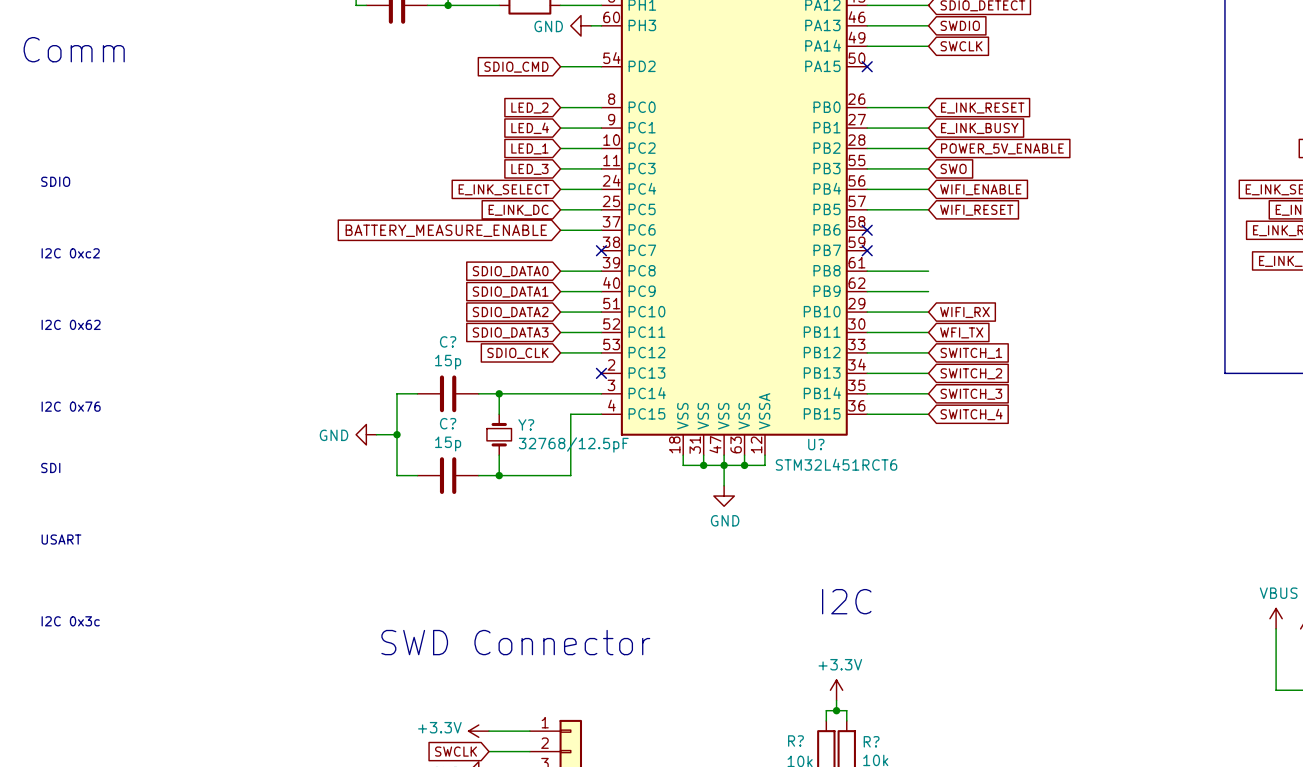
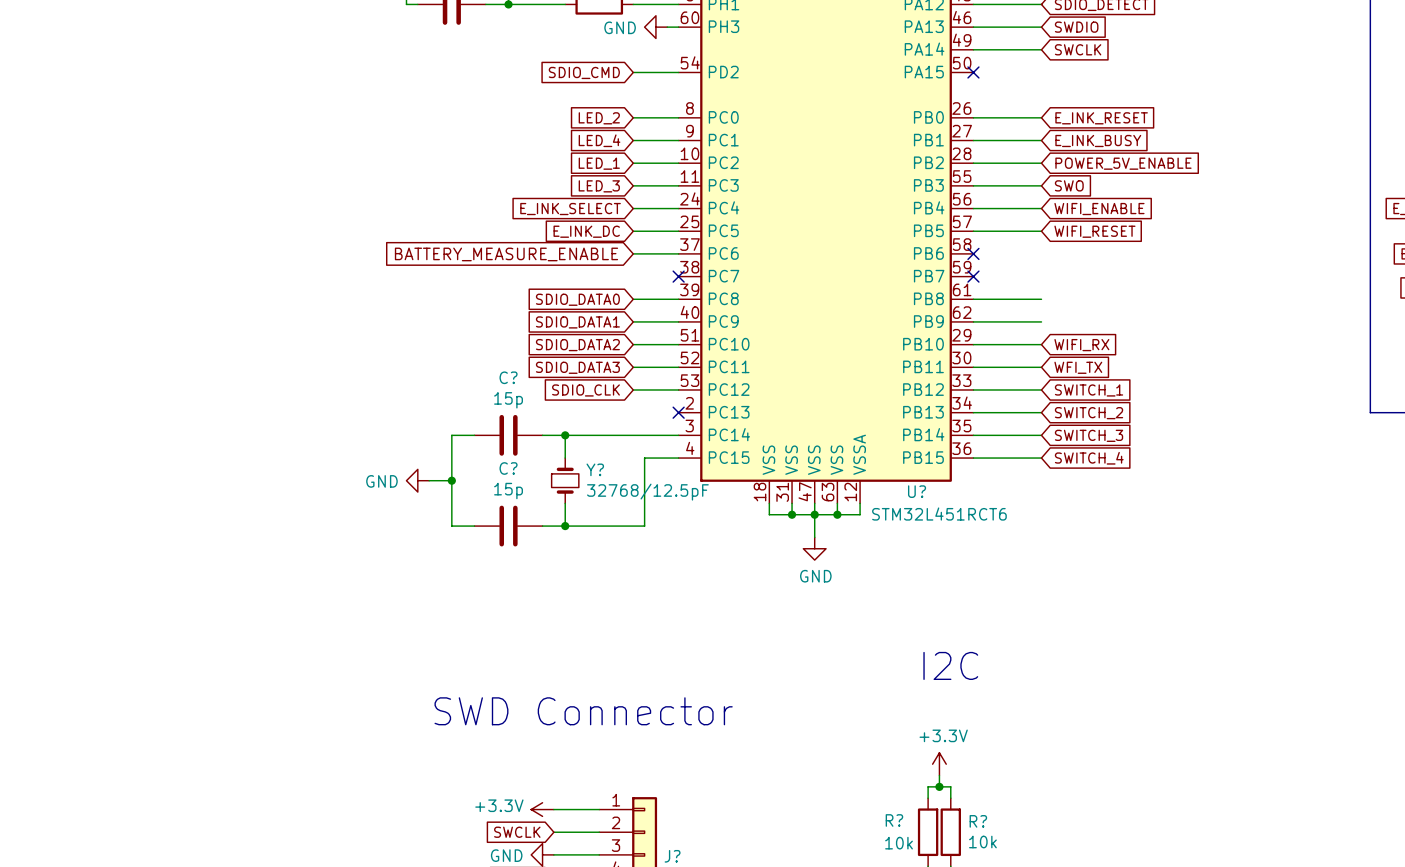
text: Comm (74, 49) -> none
text: SDIO (55, 181) -> none
text: I2C 0xc2 (70, 253) -> none
text: I2C 0x62 (71, 324) -> none
text: I2C 0x76 (71, 406) -> none
text: SDI (50, 467) -> none
text: USART (61, 539) -> none
text: I2C 0x3c (70, 621) -> none

